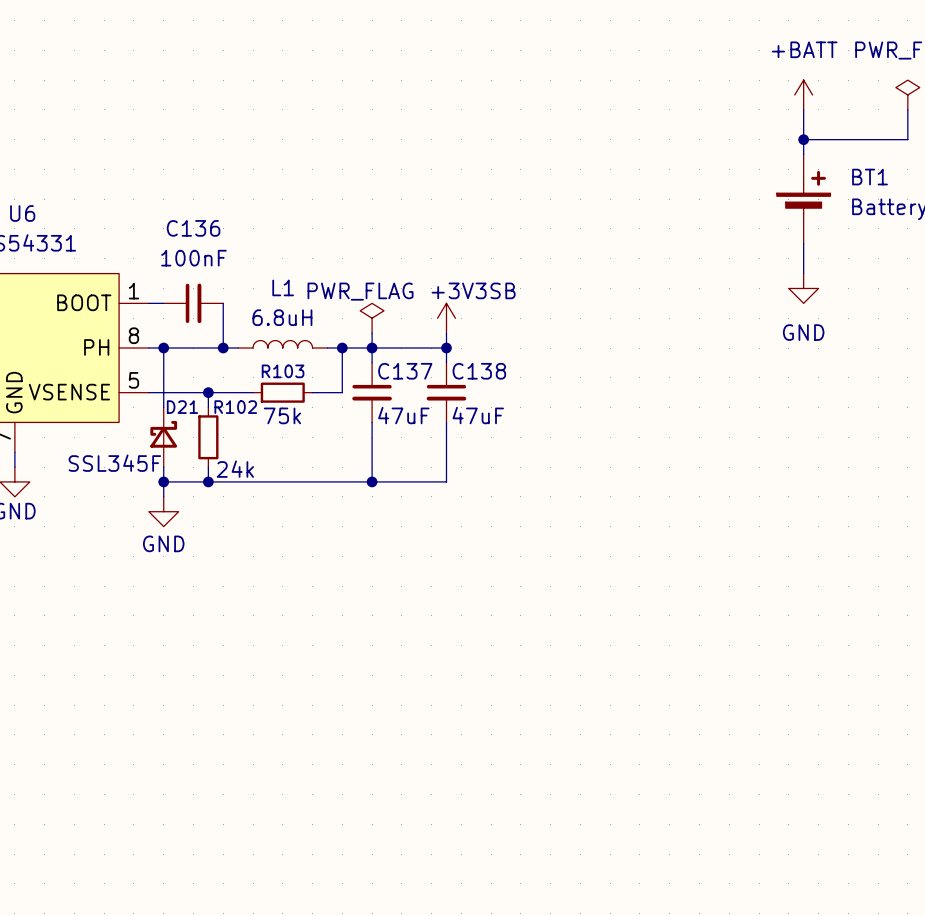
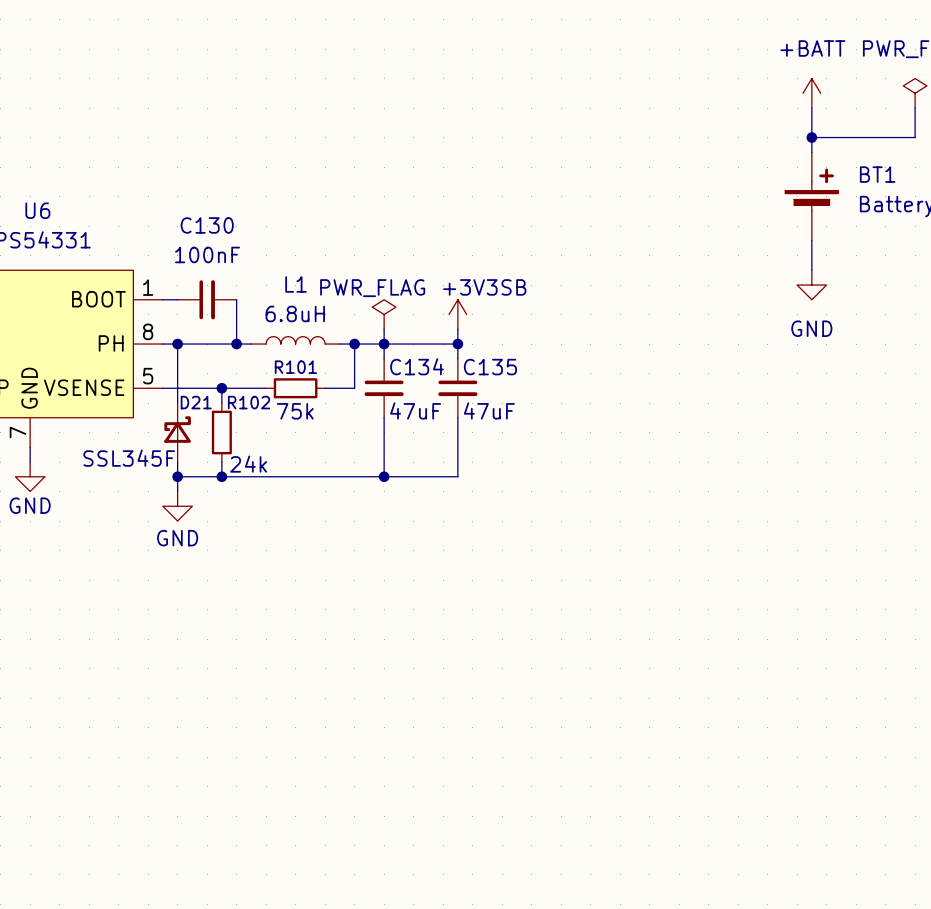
C136 name: C136 (193, 228) -> C130 (207, 225)
R103 name: R103 (283, 371) -> R101 (295, 367)
C137 name: C137 (405, 371) -> C134 (417, 366)
C138 name: C138 (479, 371) -> C135 (490, 367)

